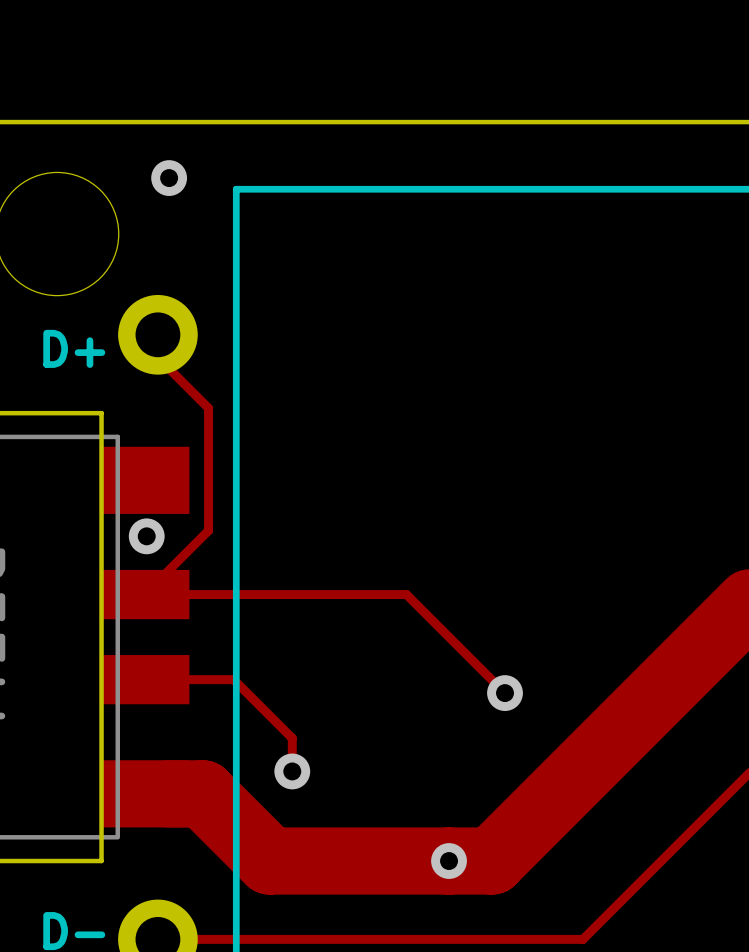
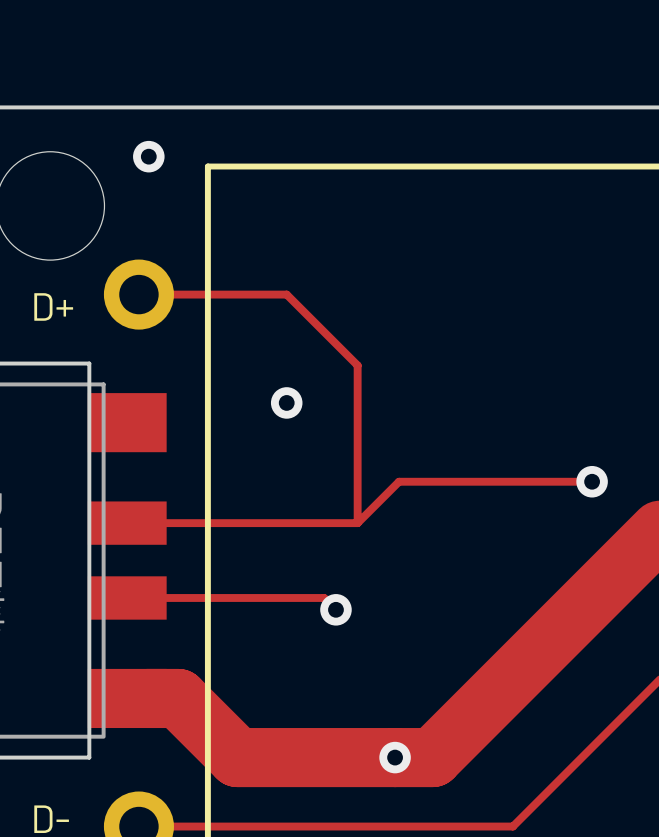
track: none -> (148, 294) (286, 294) (357, 365) (357, 523) (399, 481) (592, 481)
track: (157, 357) (208, 408) (208, 530) (144, 594) -> none
via: none -> (286, 402)
via: (146, 536) -> none
via: none -> (592, 481)
track: (406, 594) (505, 693) -> none
track: (233, 679) (292, 738) (292, 771) -> (205, 597) (324, 597) (335, 609)
via: none -> (335, 609)
via: (505, 693) -> none
via: (292, 771) -> none

